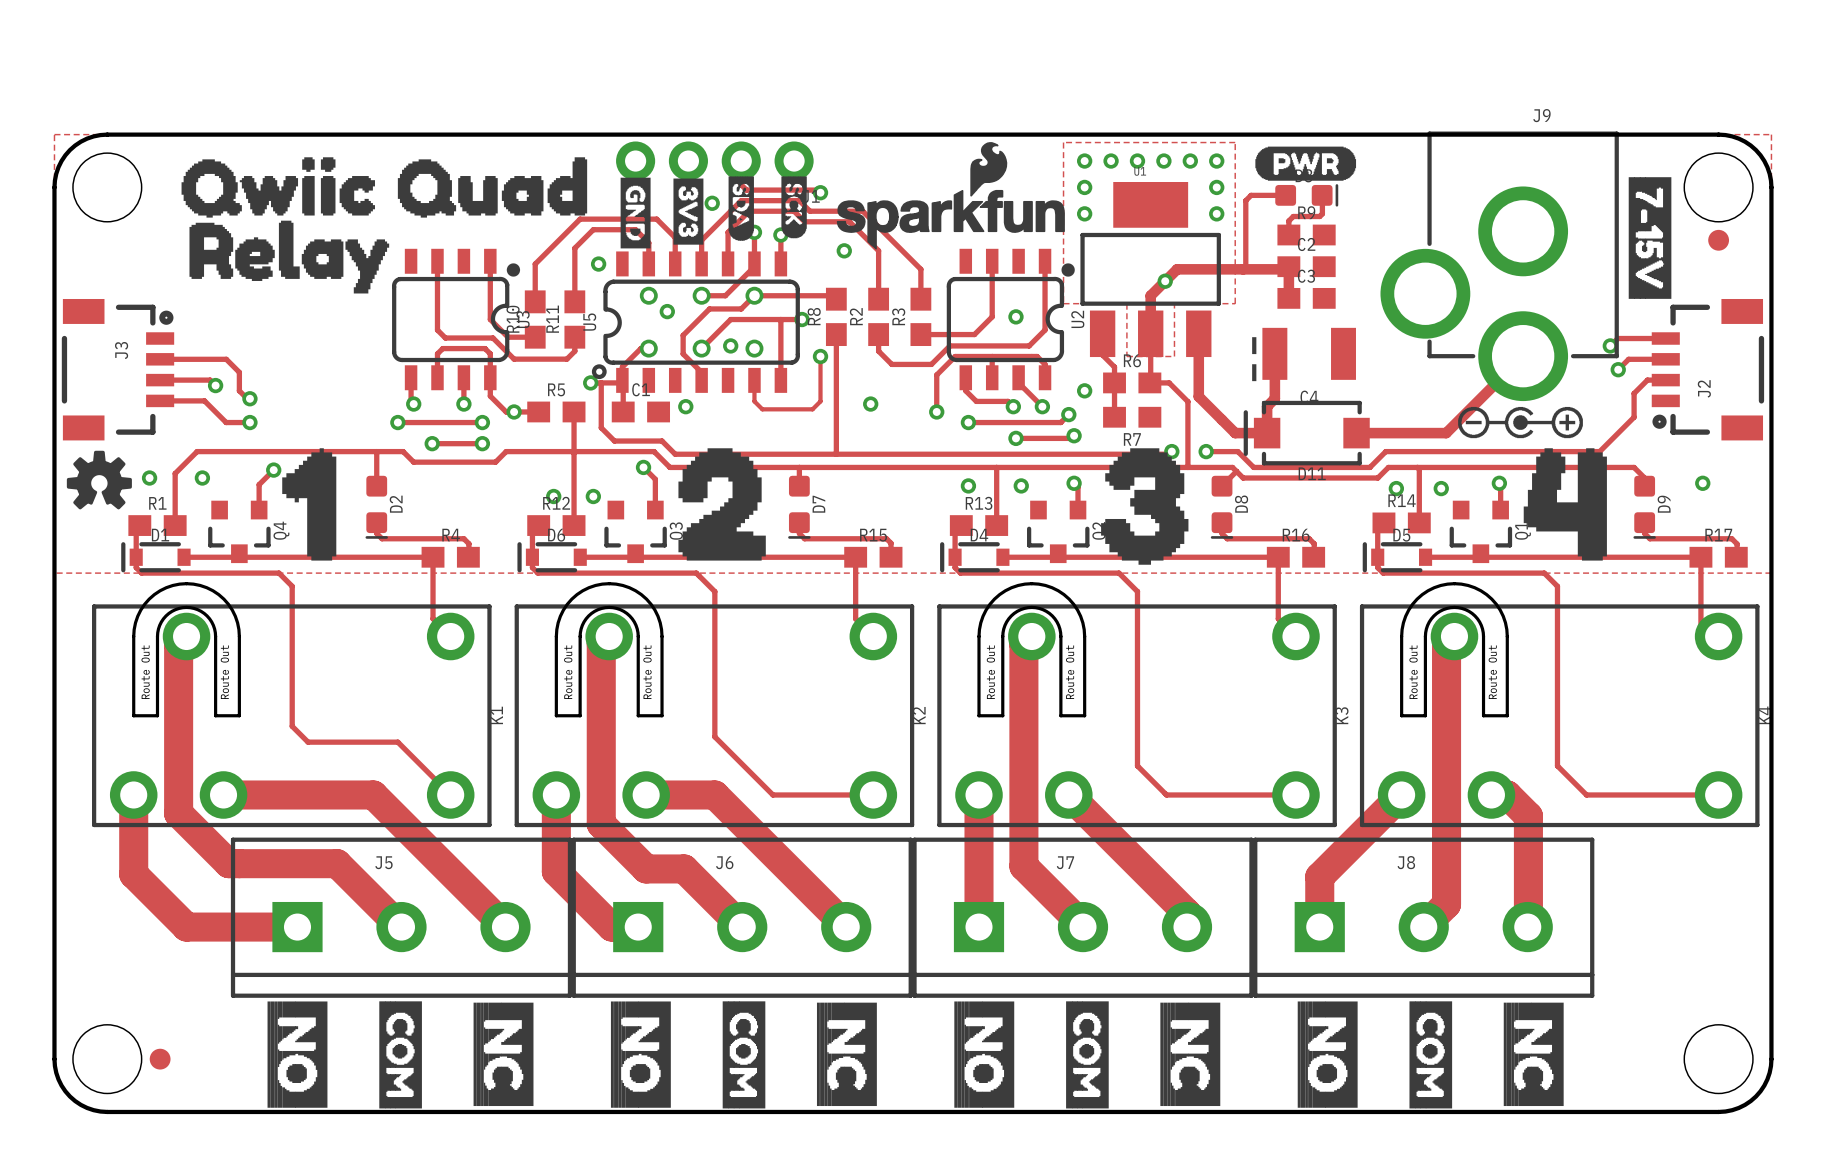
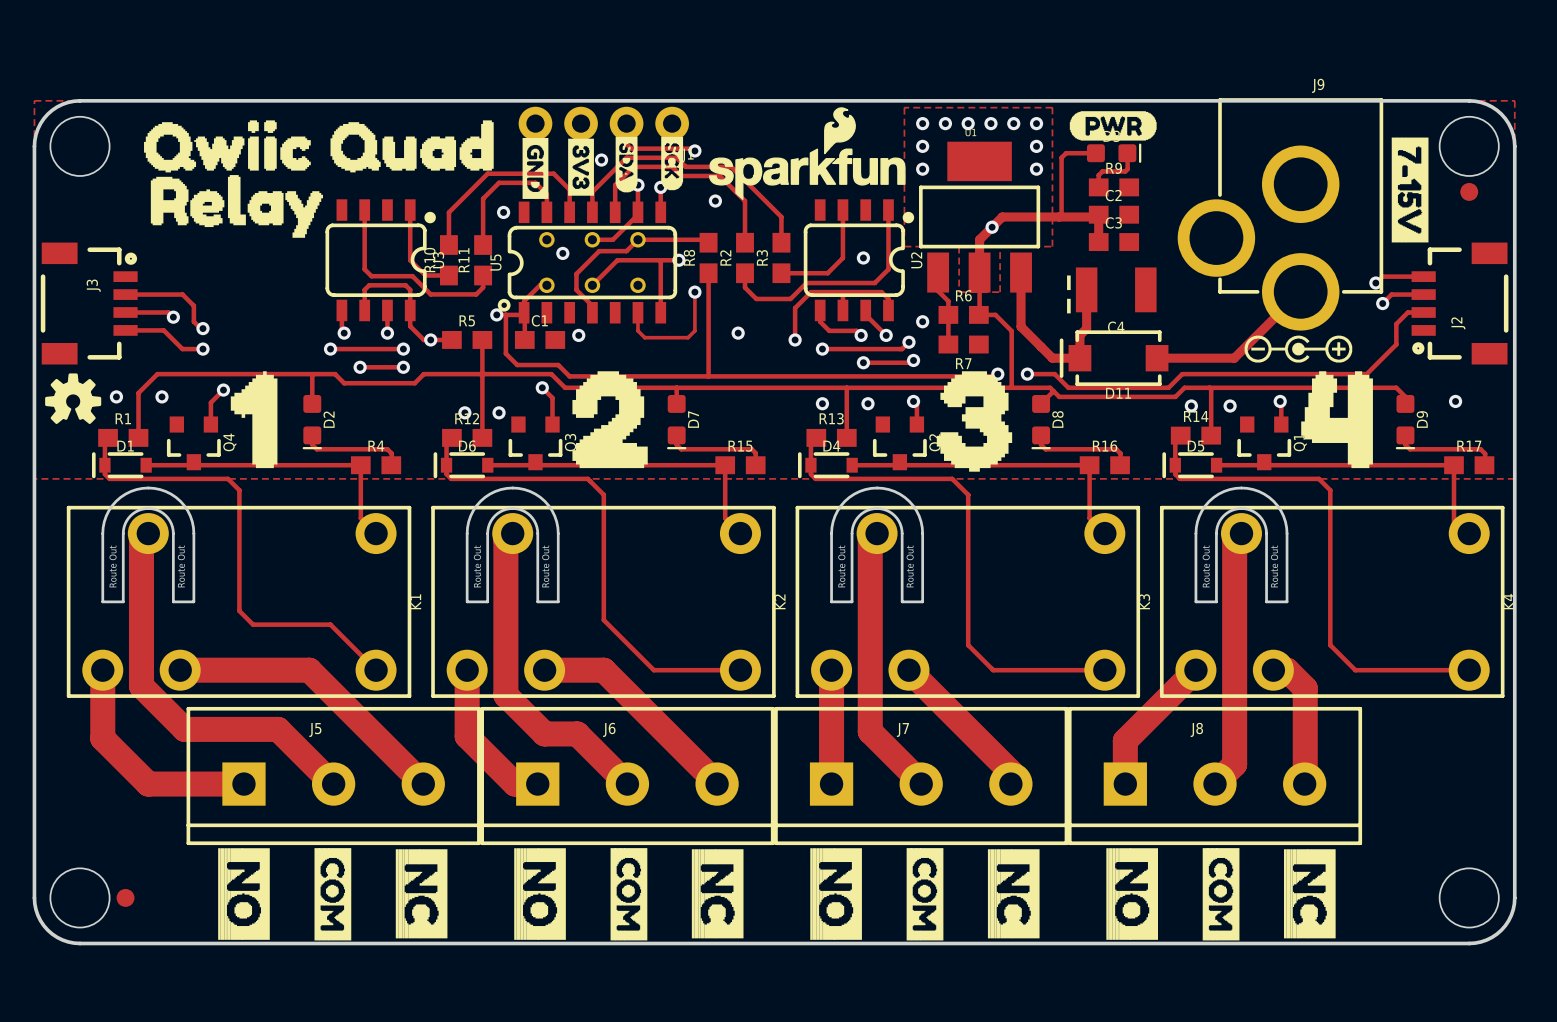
via: (730, 345) -> none

